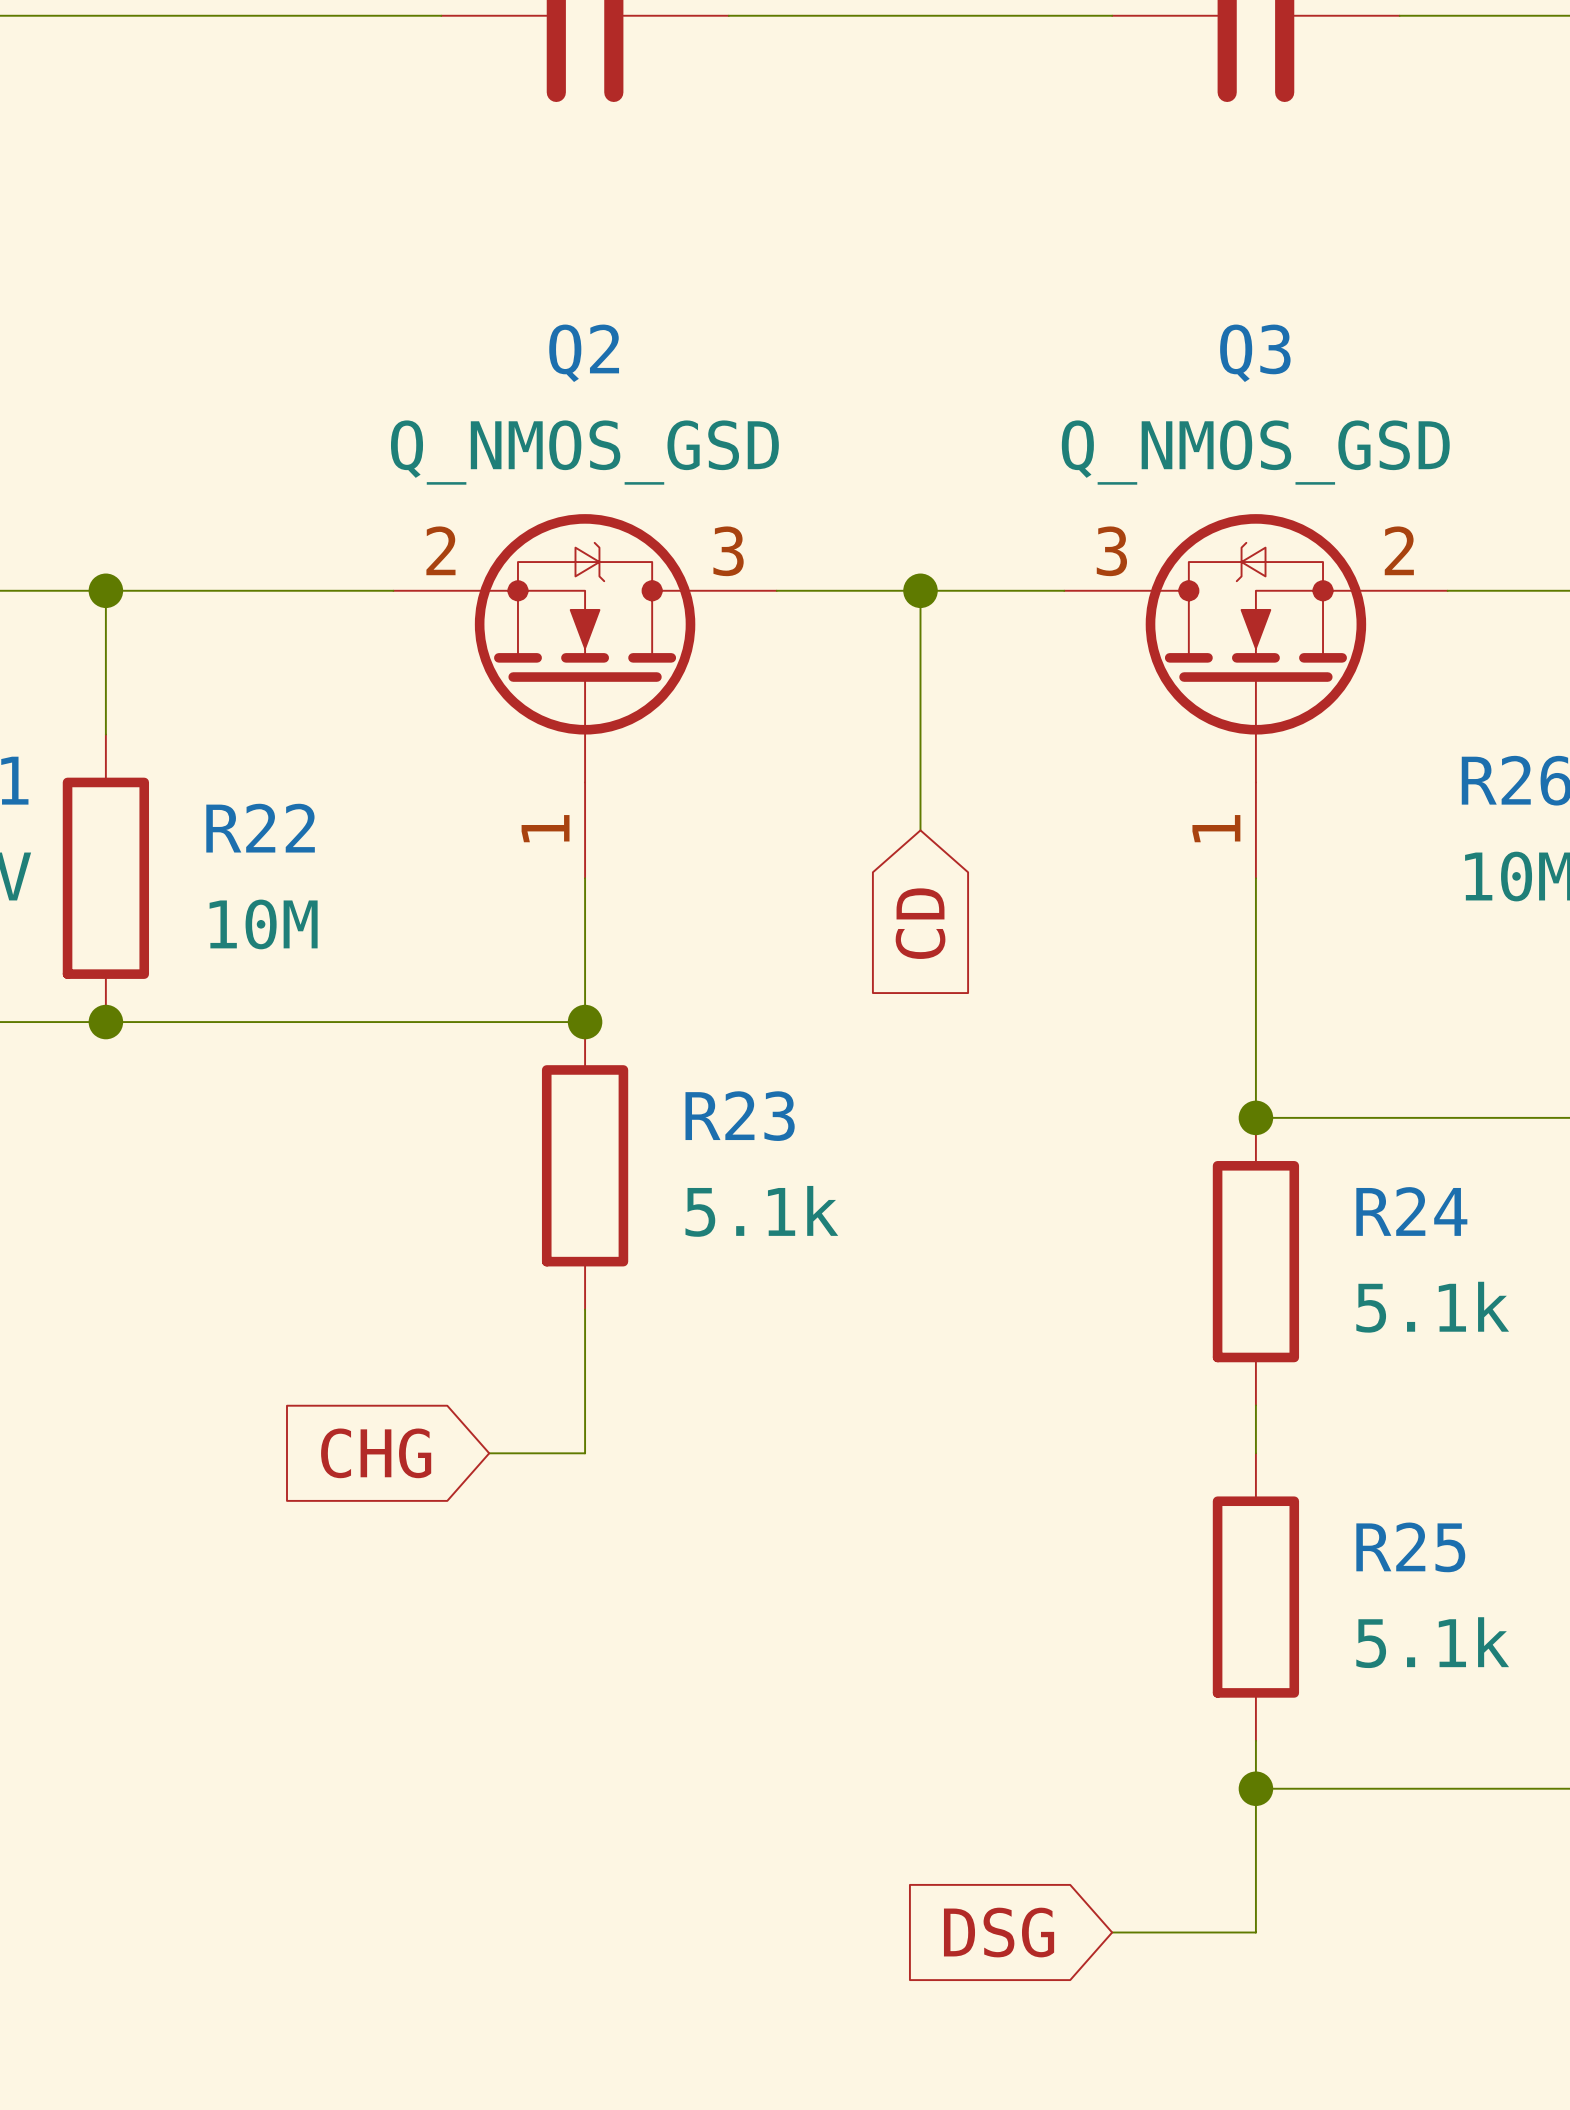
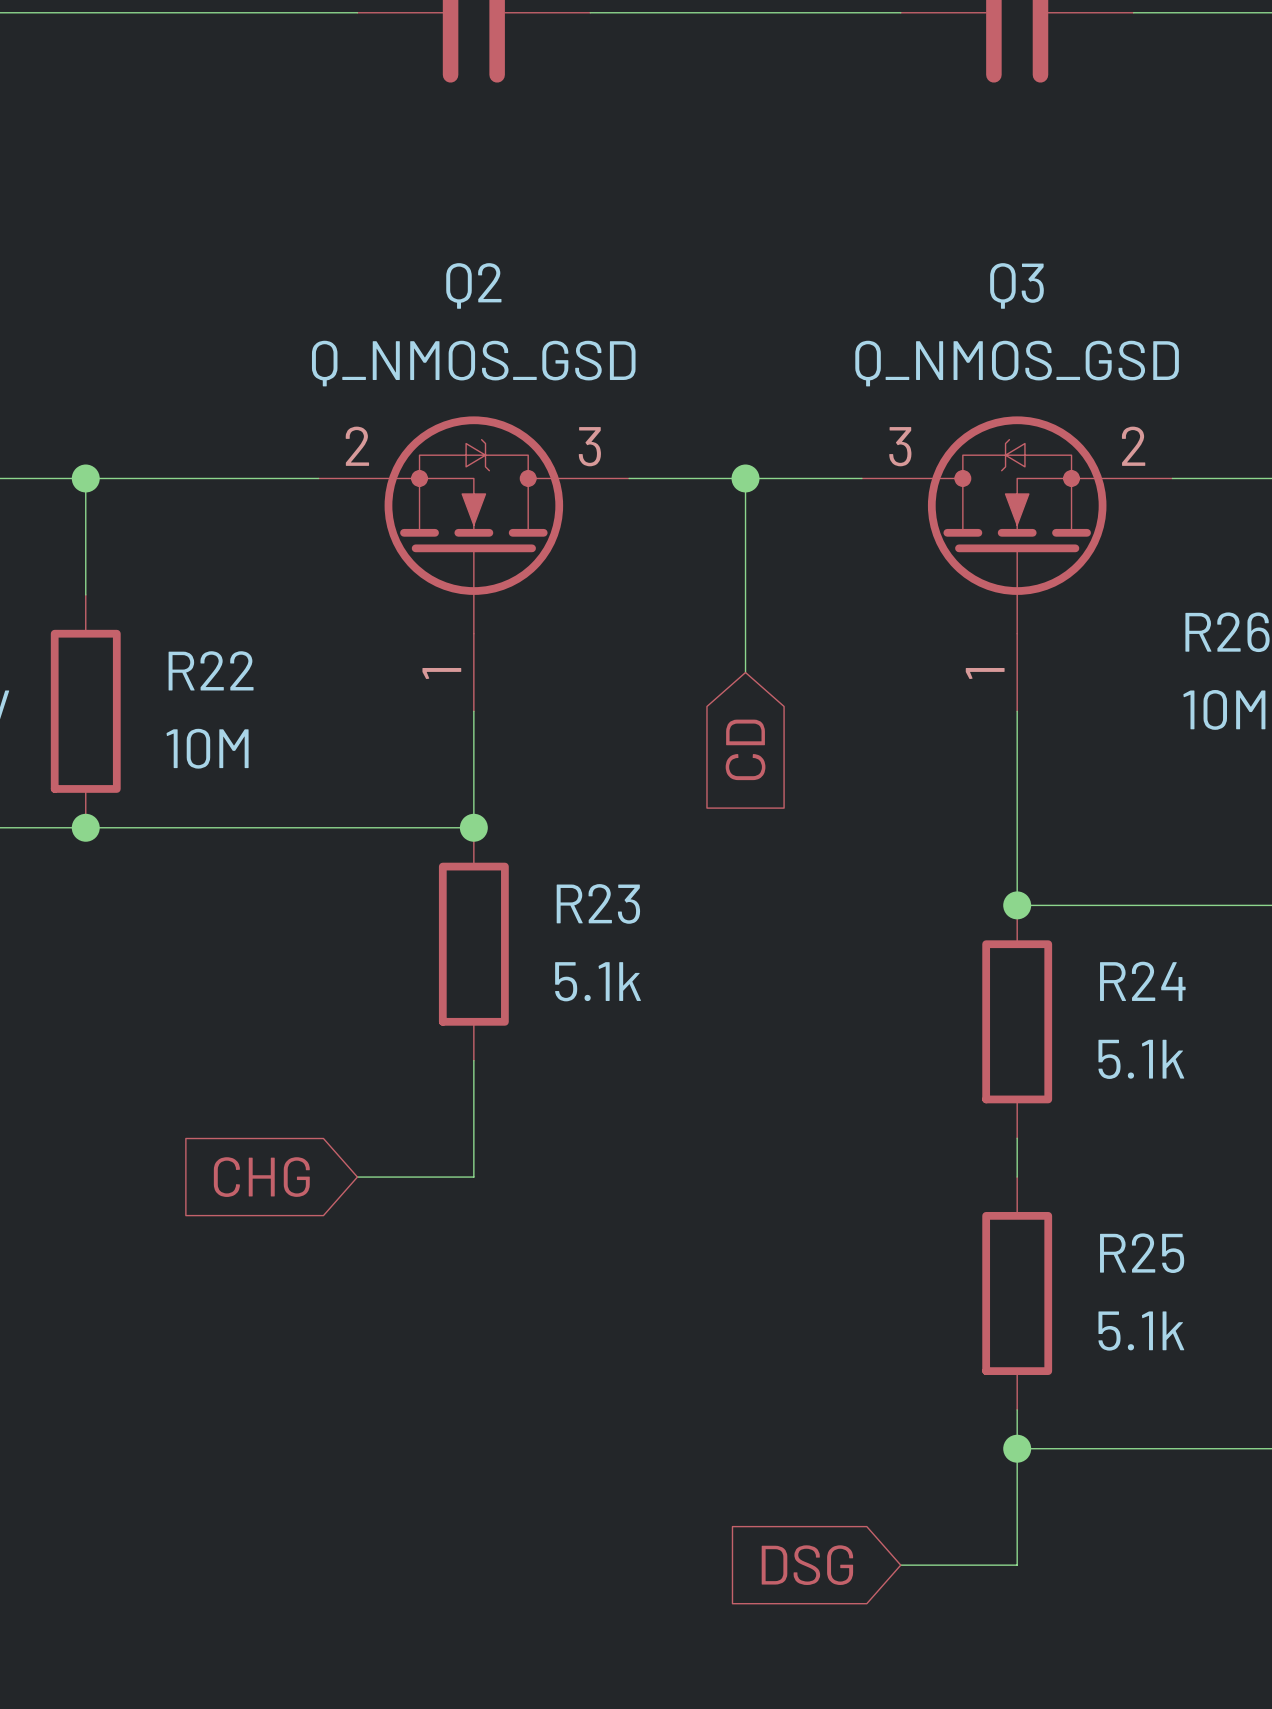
global label position: CHG (376, 1453) -> CHG (261, 1177)
wire: none -> (357, 1177) (396, 1177)

